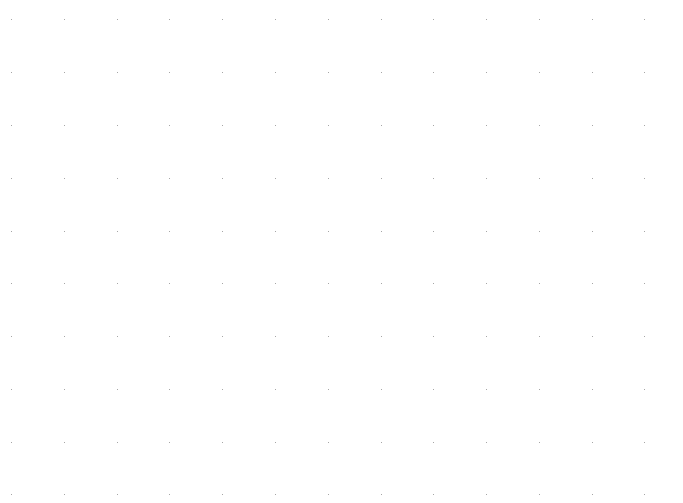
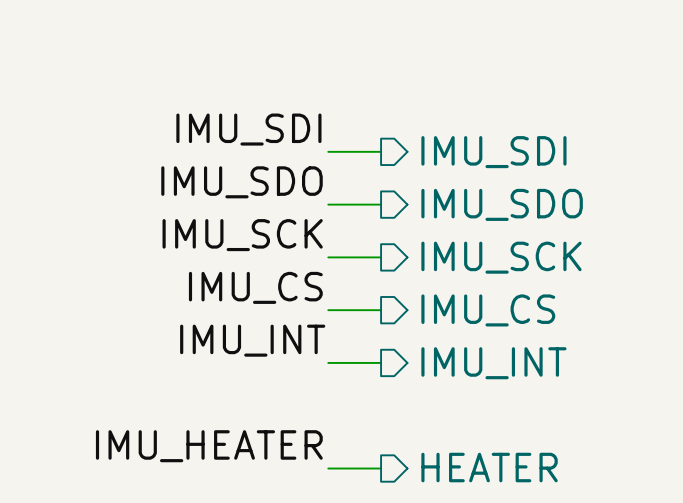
label: none -> IMU_SDI (248, 129)
wire: none -> (328, 151) (381, 151)
sheet pin: none -> IMU_SDI (493, 152)
label: none -> IMU_SDO (242, 182)
wire: none -> (328, 204) (381, 204)
sheet pin: none -> IMU_SDO (502, 204)
label: none -> IMU_SCK (242, 235)
wire: none -> (328, 257) (381, 257)
sheet pin: none -> IMU_SCK (501, 257)
label: none -> IMU_CS (255, 287)
wire: none -> (328, 310) (381, 310)
sheet pin: none -> IMU_CS (488, 310)
label: none -> IMU_INT (252, 340)
wire: none -> (328, 362) (381, 362)
sheet pin: none -> IMU_INT (493, 363)
label: none -> IMU_HEATER (209, 446)
sheet pin: none -> HEATER (489, 467)
wire: none -> (328, 468) (381, 468)

